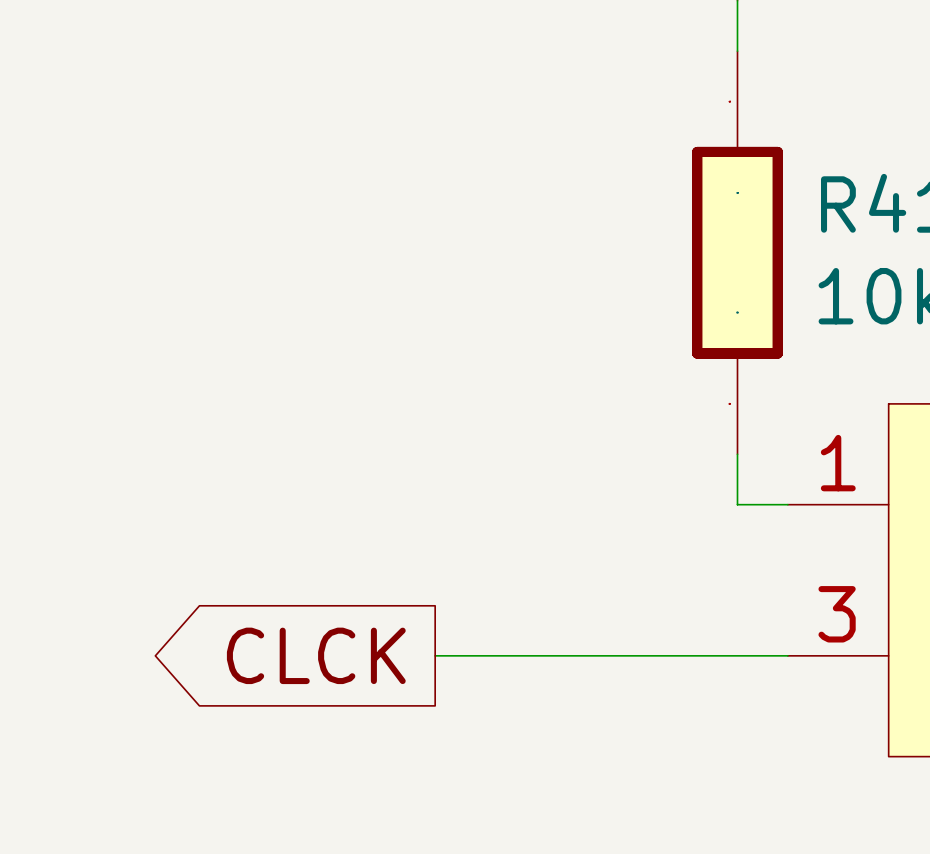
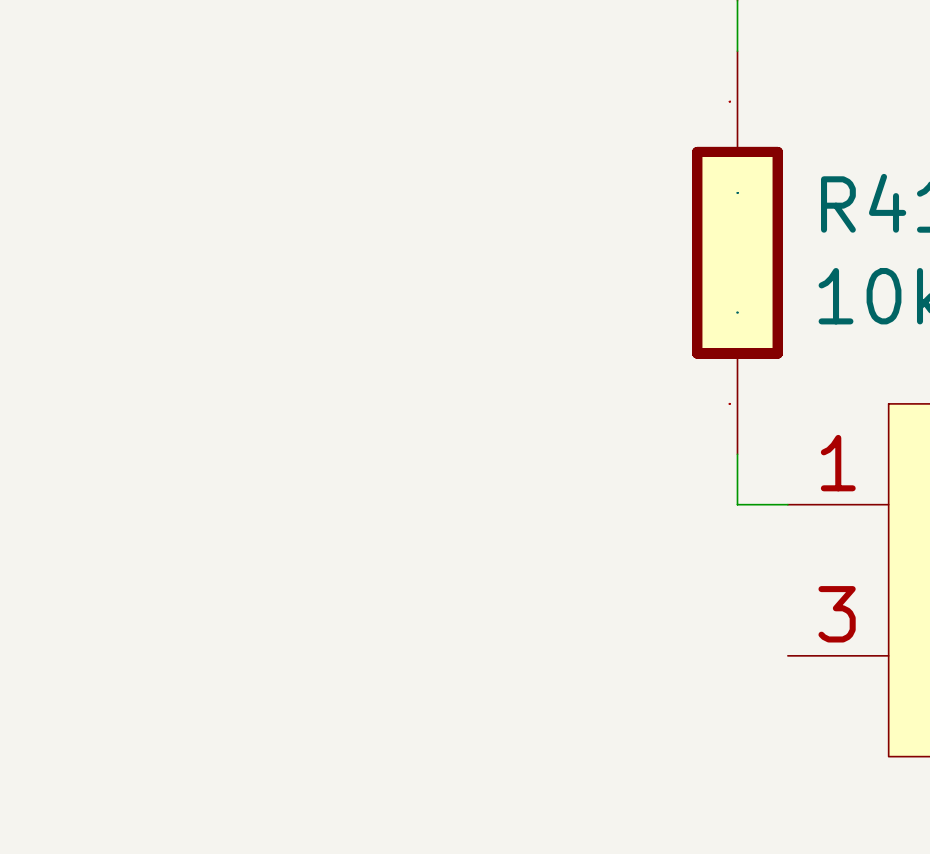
global label: CLCK (316, 655) -> none
wire: (435, 655) (787, 655) -> none

